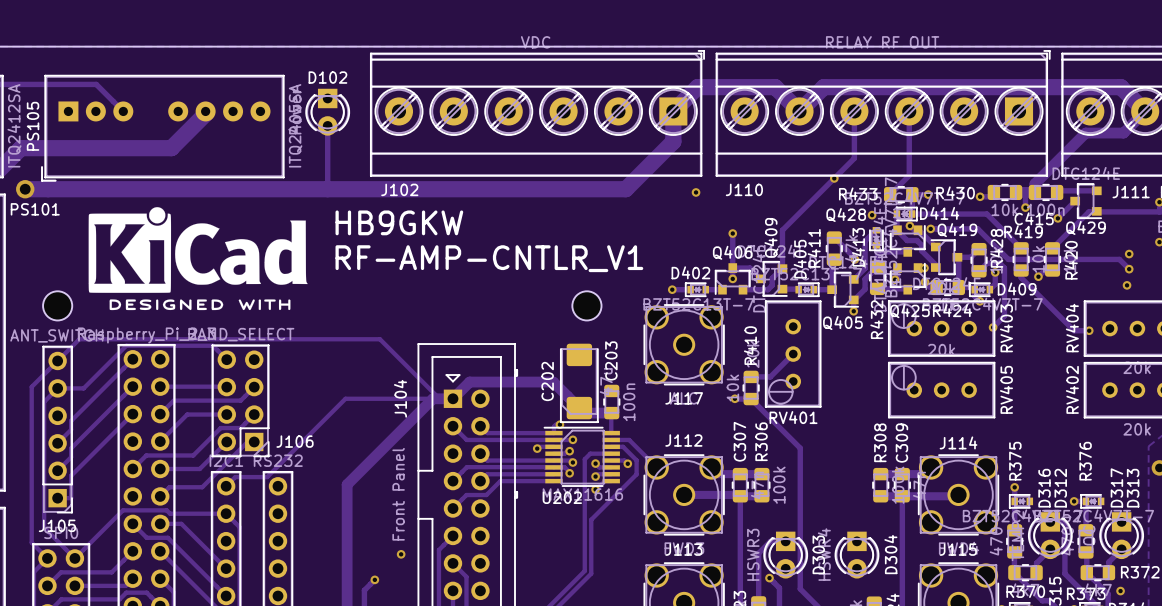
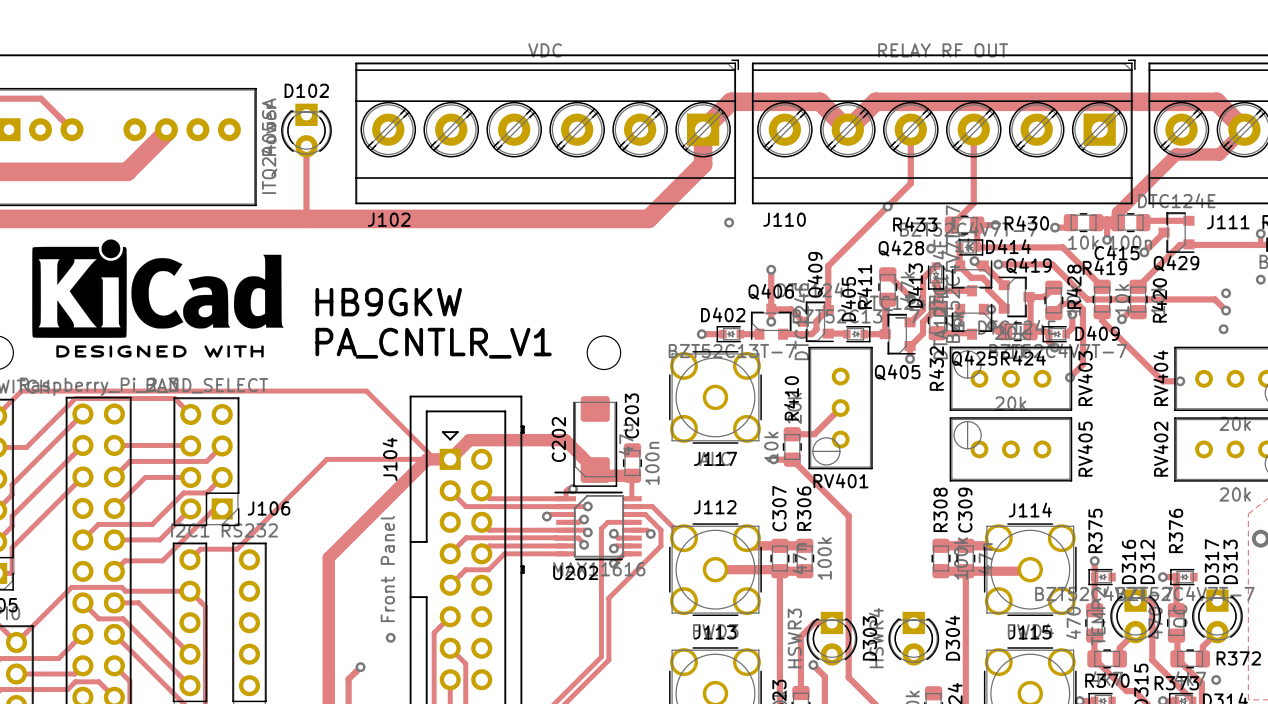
text: HB9GKW (399, 222) -> none
text: RF-AMP-CNTLR_V1 (489, 258) -> HB9GKW (388, 302)
text: none -> PA_CNTLR_V1 (433, 343)

